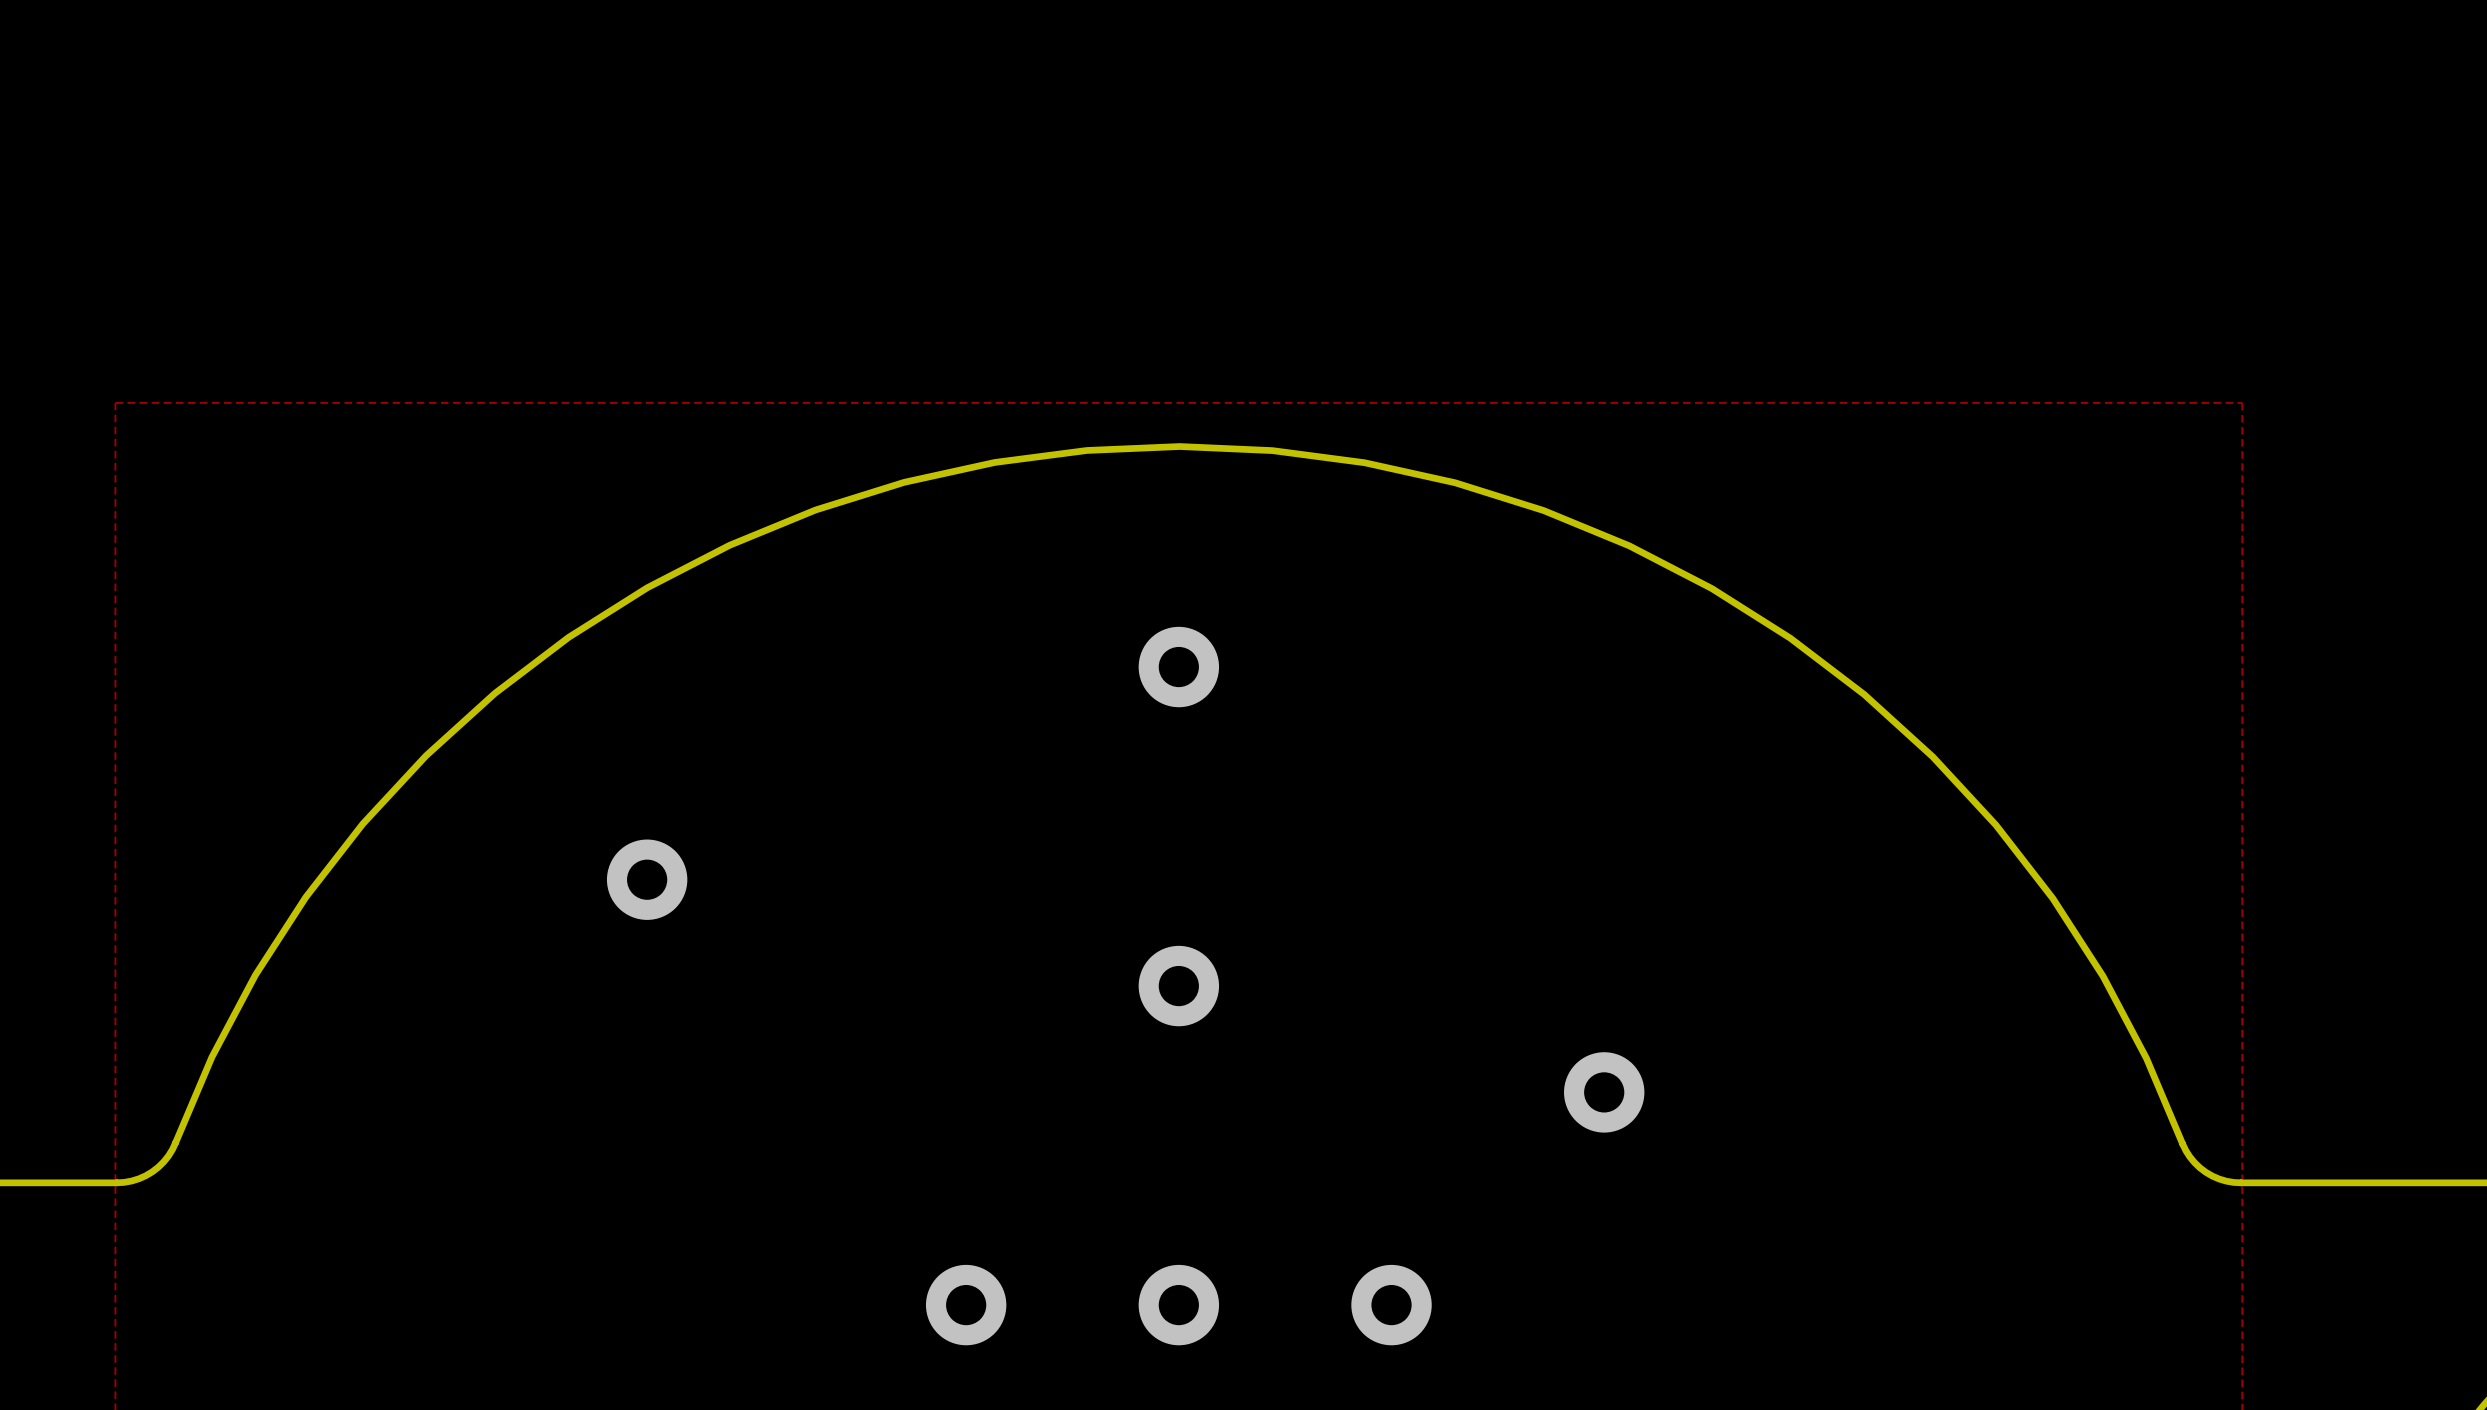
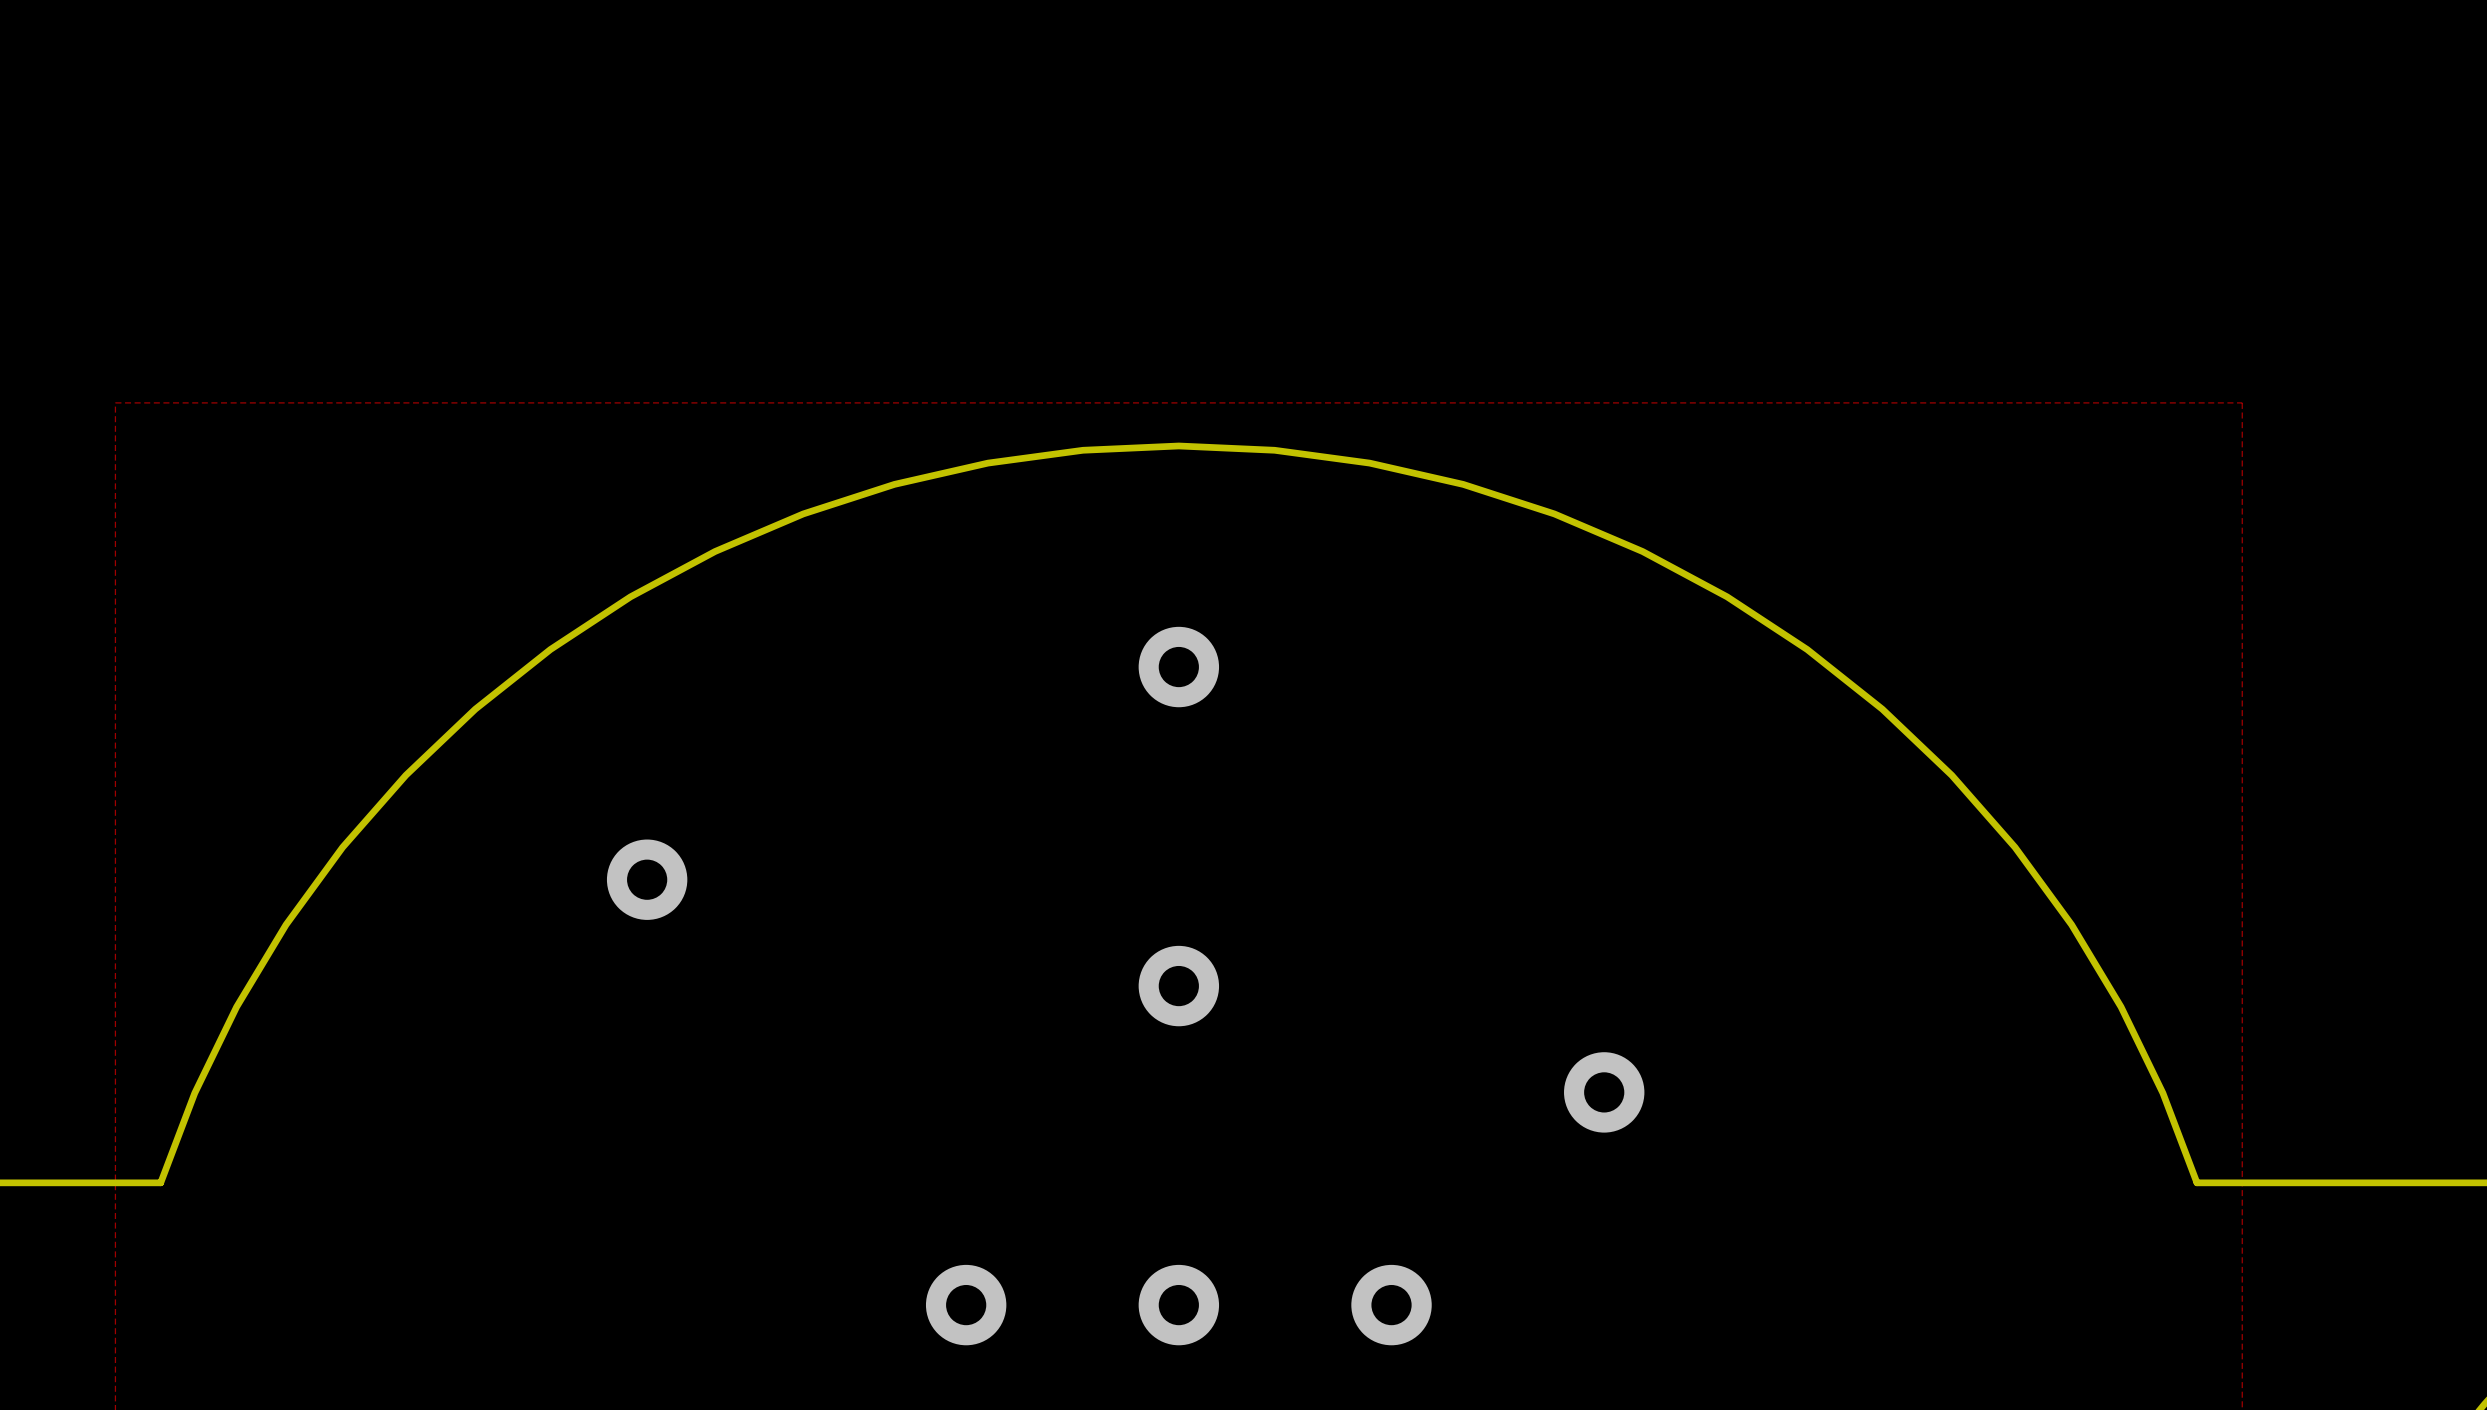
board edge: (116, 1182) (131, 1181) (145, 1175) (158, 1167) (168, 1155) (211, 1057) (255, 975) (305, 897) (362, 823) (426, 755) (494, 693) (568, 637) (647, 587) (729, 545) (815, 510) (904, 482) (994, 462) (1086, 450) (1179, 446) (1272, 450) (1364, 462) (1455, 482) (1543, 510) (1629, 545) (1711, 588) (1790, 638) (1864, 694) (1932, 756) (1995, 825) (2052, 898) (2103, 976) (2146, 1058) (2189, 1156) (2199, 1167) (2212, 1176) (2226, 1181) (2241, 1182) -> (116, 1182) (160, 1182) (194, 1093) (236, 1006) (286, 924) (342, 847) (405, 775) (475, 709) (550, 649) (630, 596) (715, 551) (803, 513) (894, 484) (988, 463) (1083, 450) (1178, 445) (1274, 450) (1369, 463) (1463, 484) (1554, 513) (1642, 551) (1727, 596) (1807, 649) (1882, 709) (1951, 775) (2015, 847) (2071, 924) (2121, 1006) (2162, 1093) (2196, 1182) (2241, 1182)

